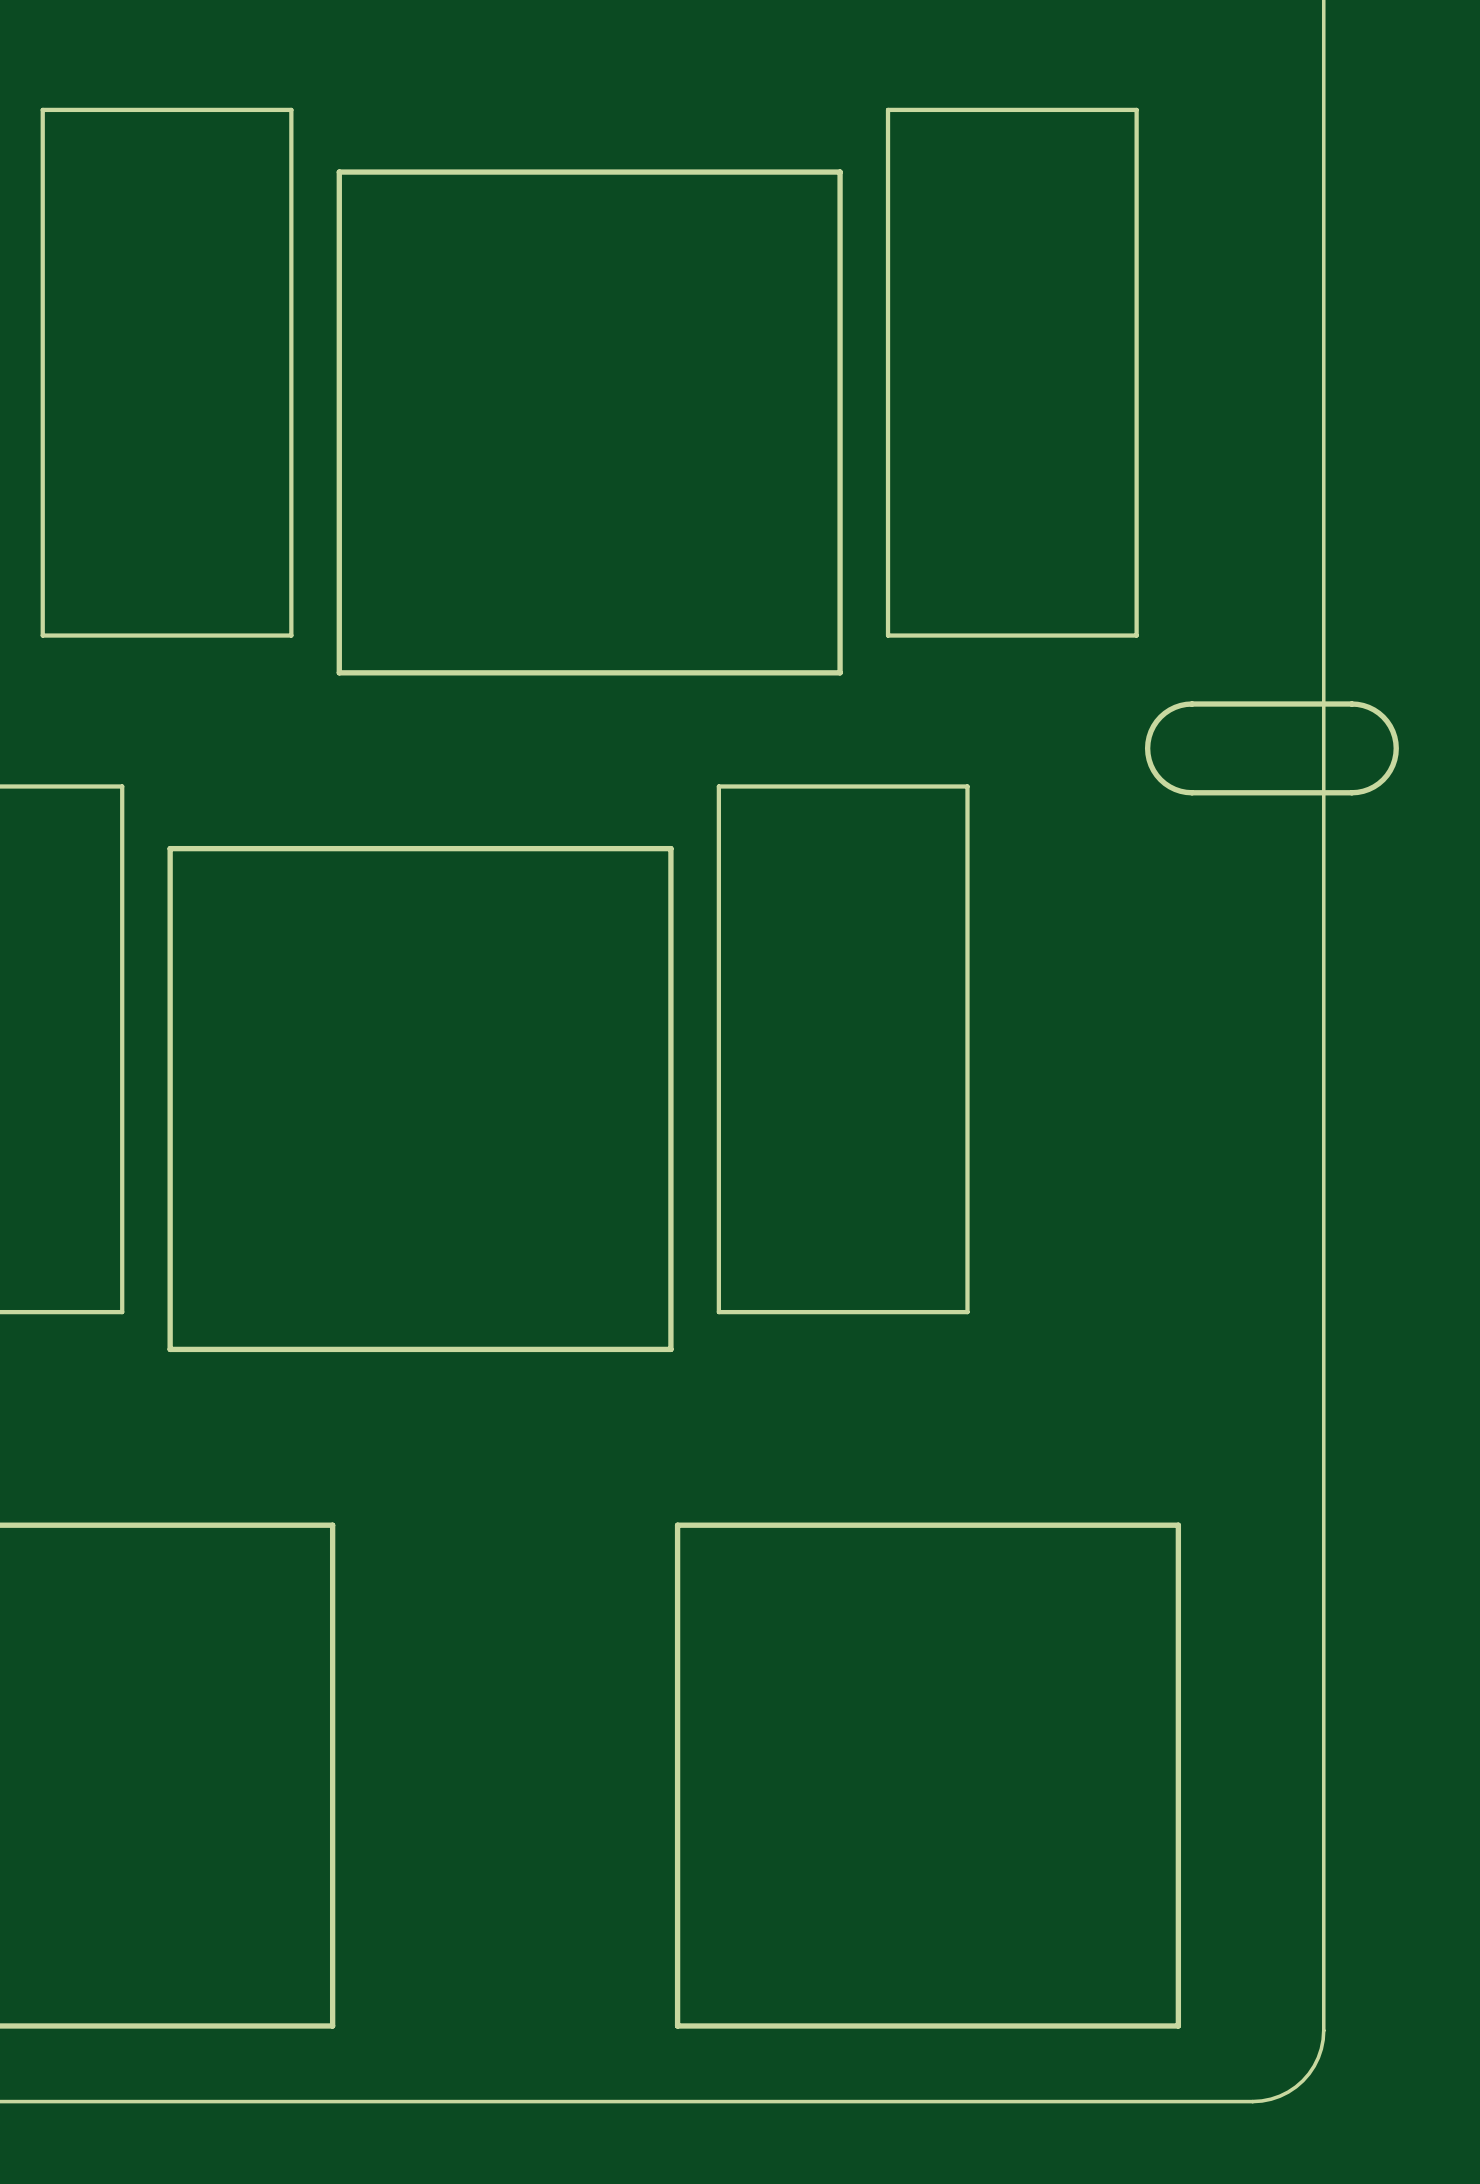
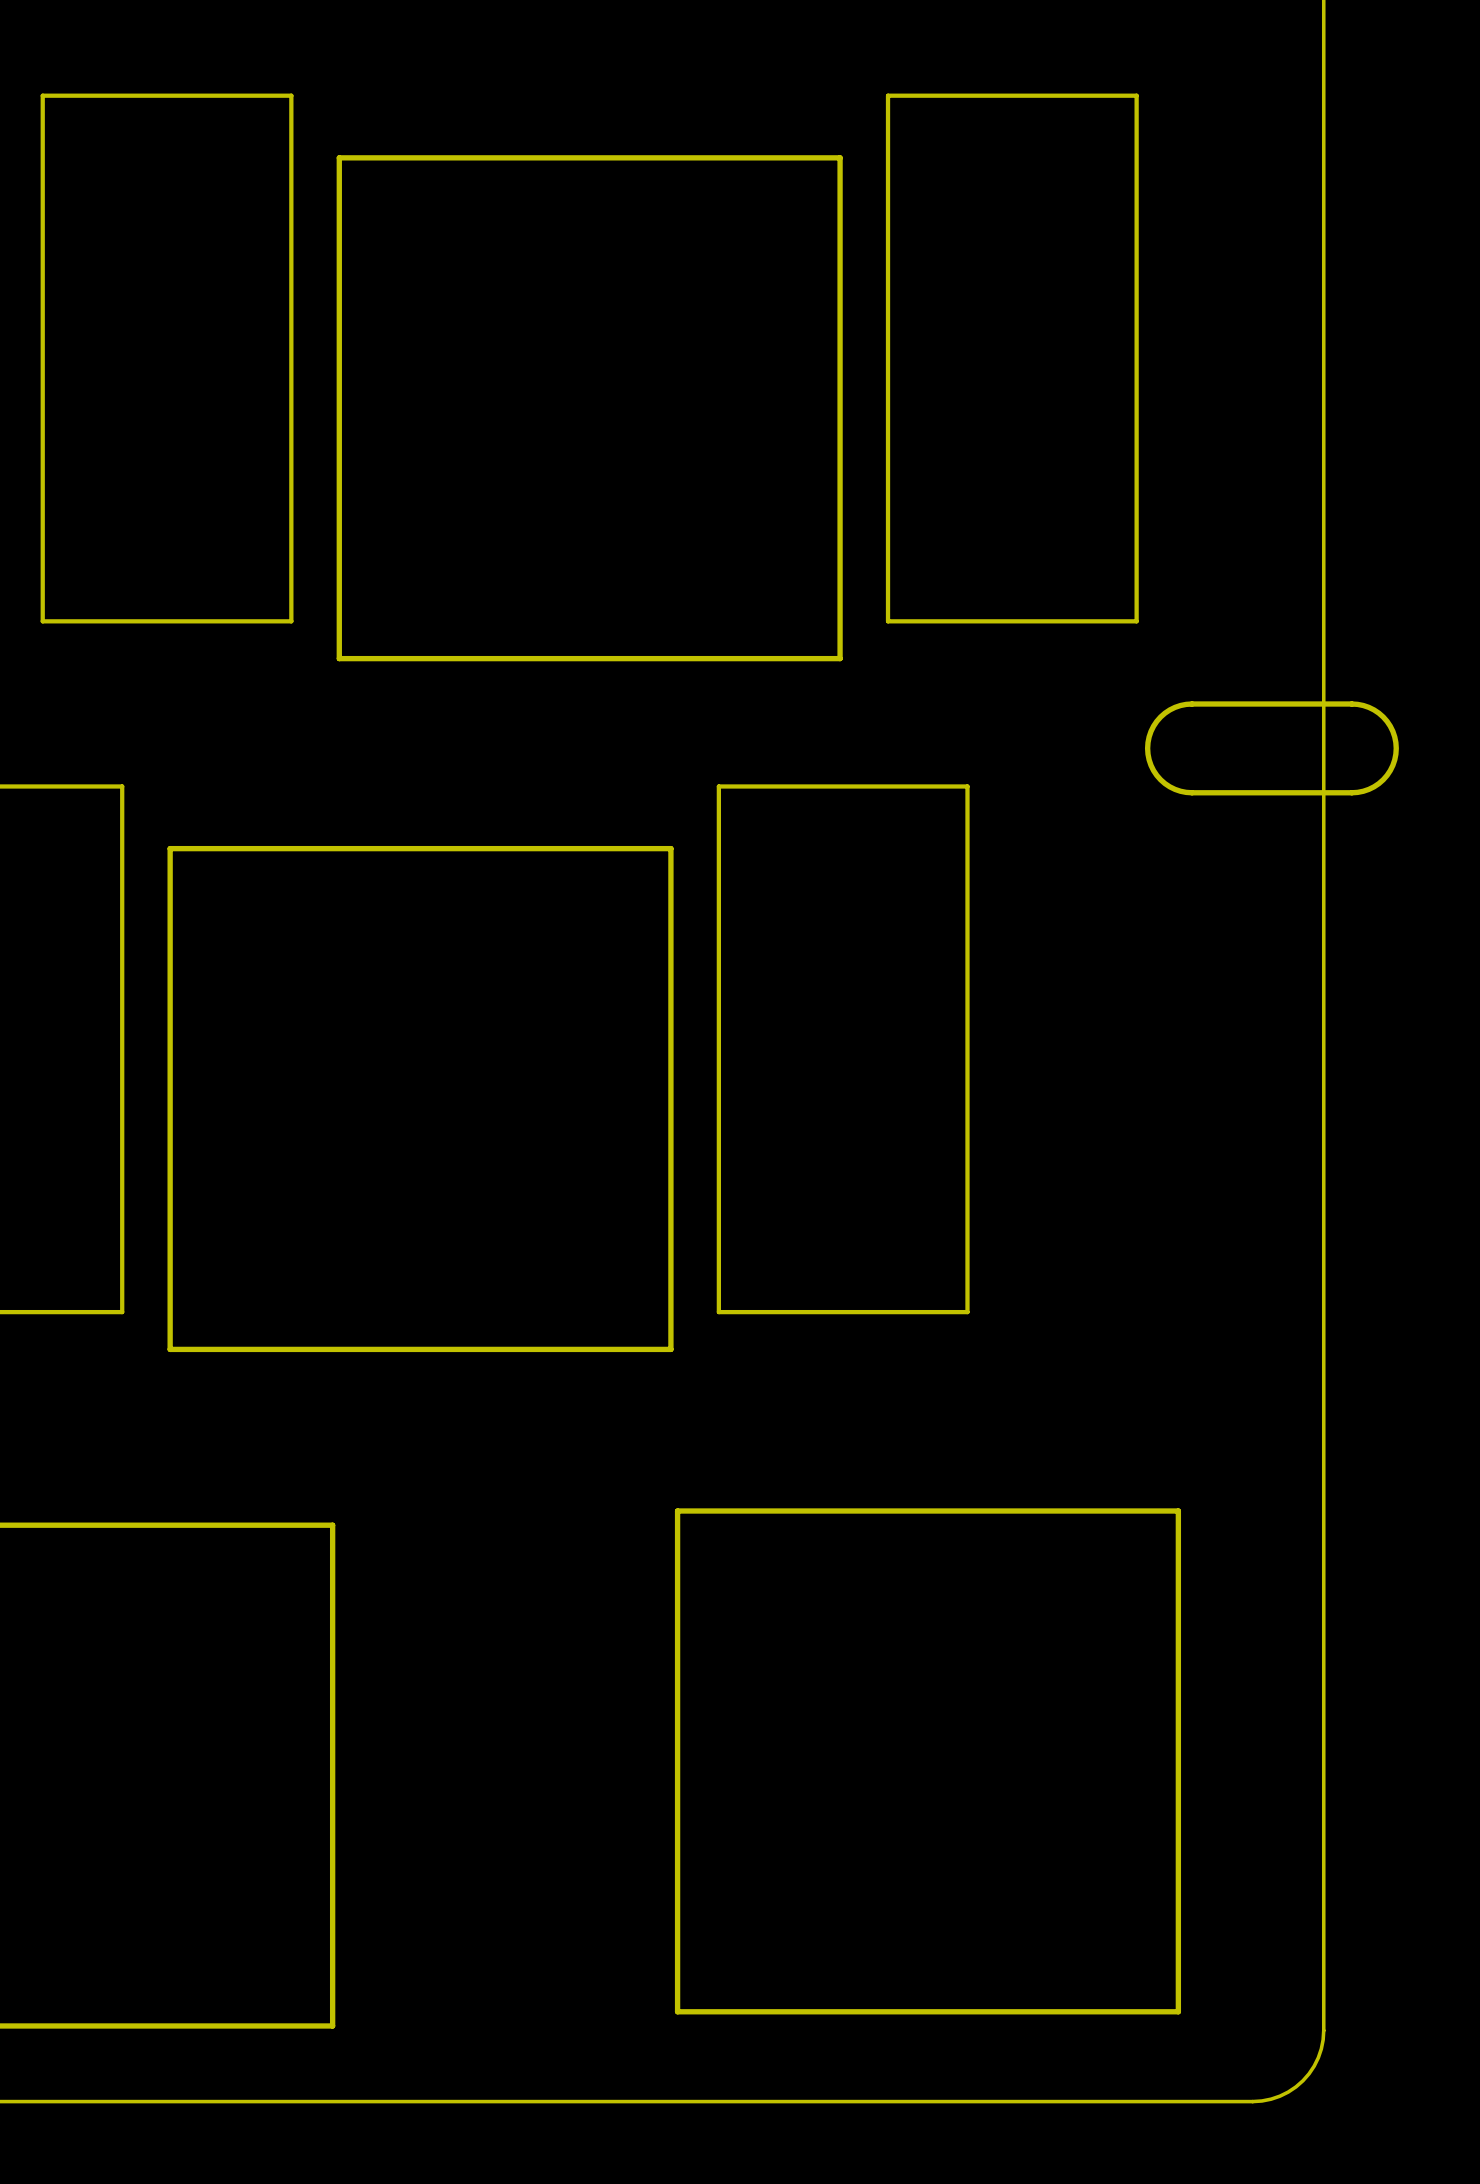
drawing position: (589, 391) -> (589, 377)
drawing position: (927, 1775) -> (927, 1761)

